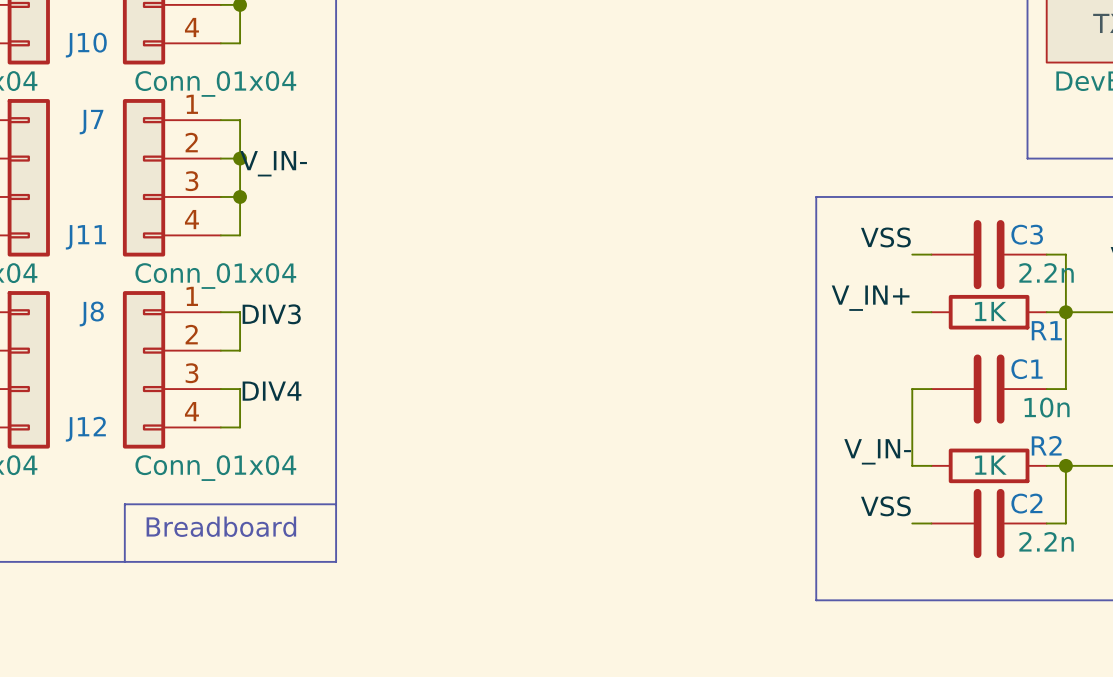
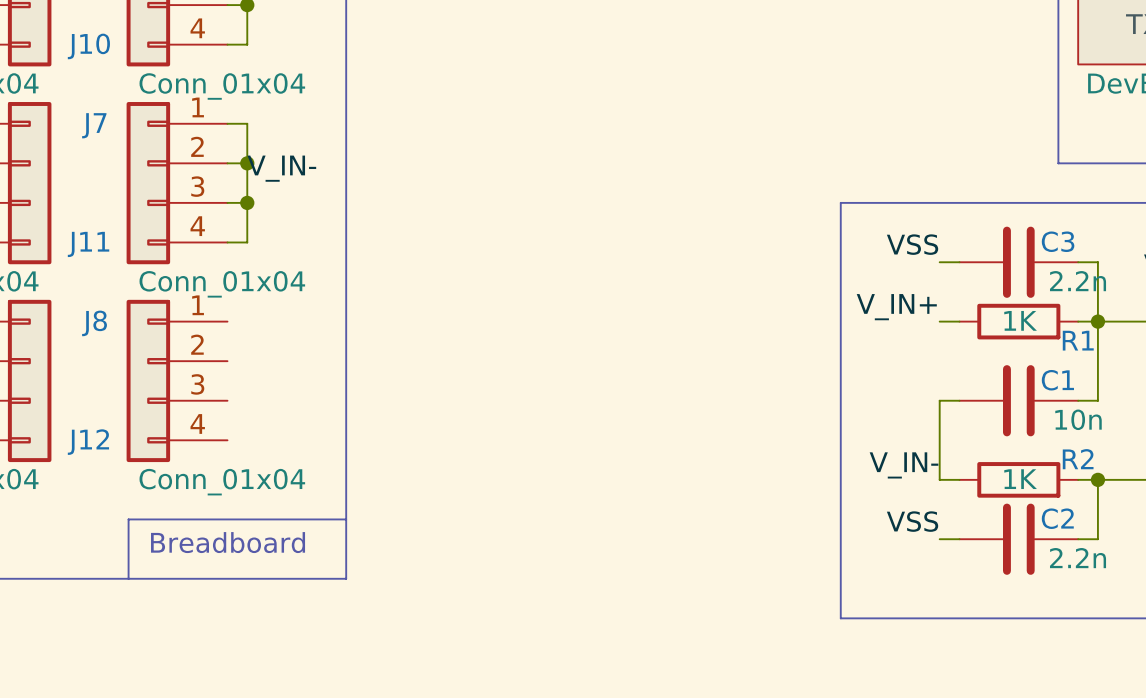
wire: (220, 312) (240, 312) (240, 350) (220, 350) -> none
label: DIV3 (271, 314) -> none
wire: (220, 389) (240, 389) (240, 427) (220, 427) -> none
label: DIV4 (272, 391) -> none

